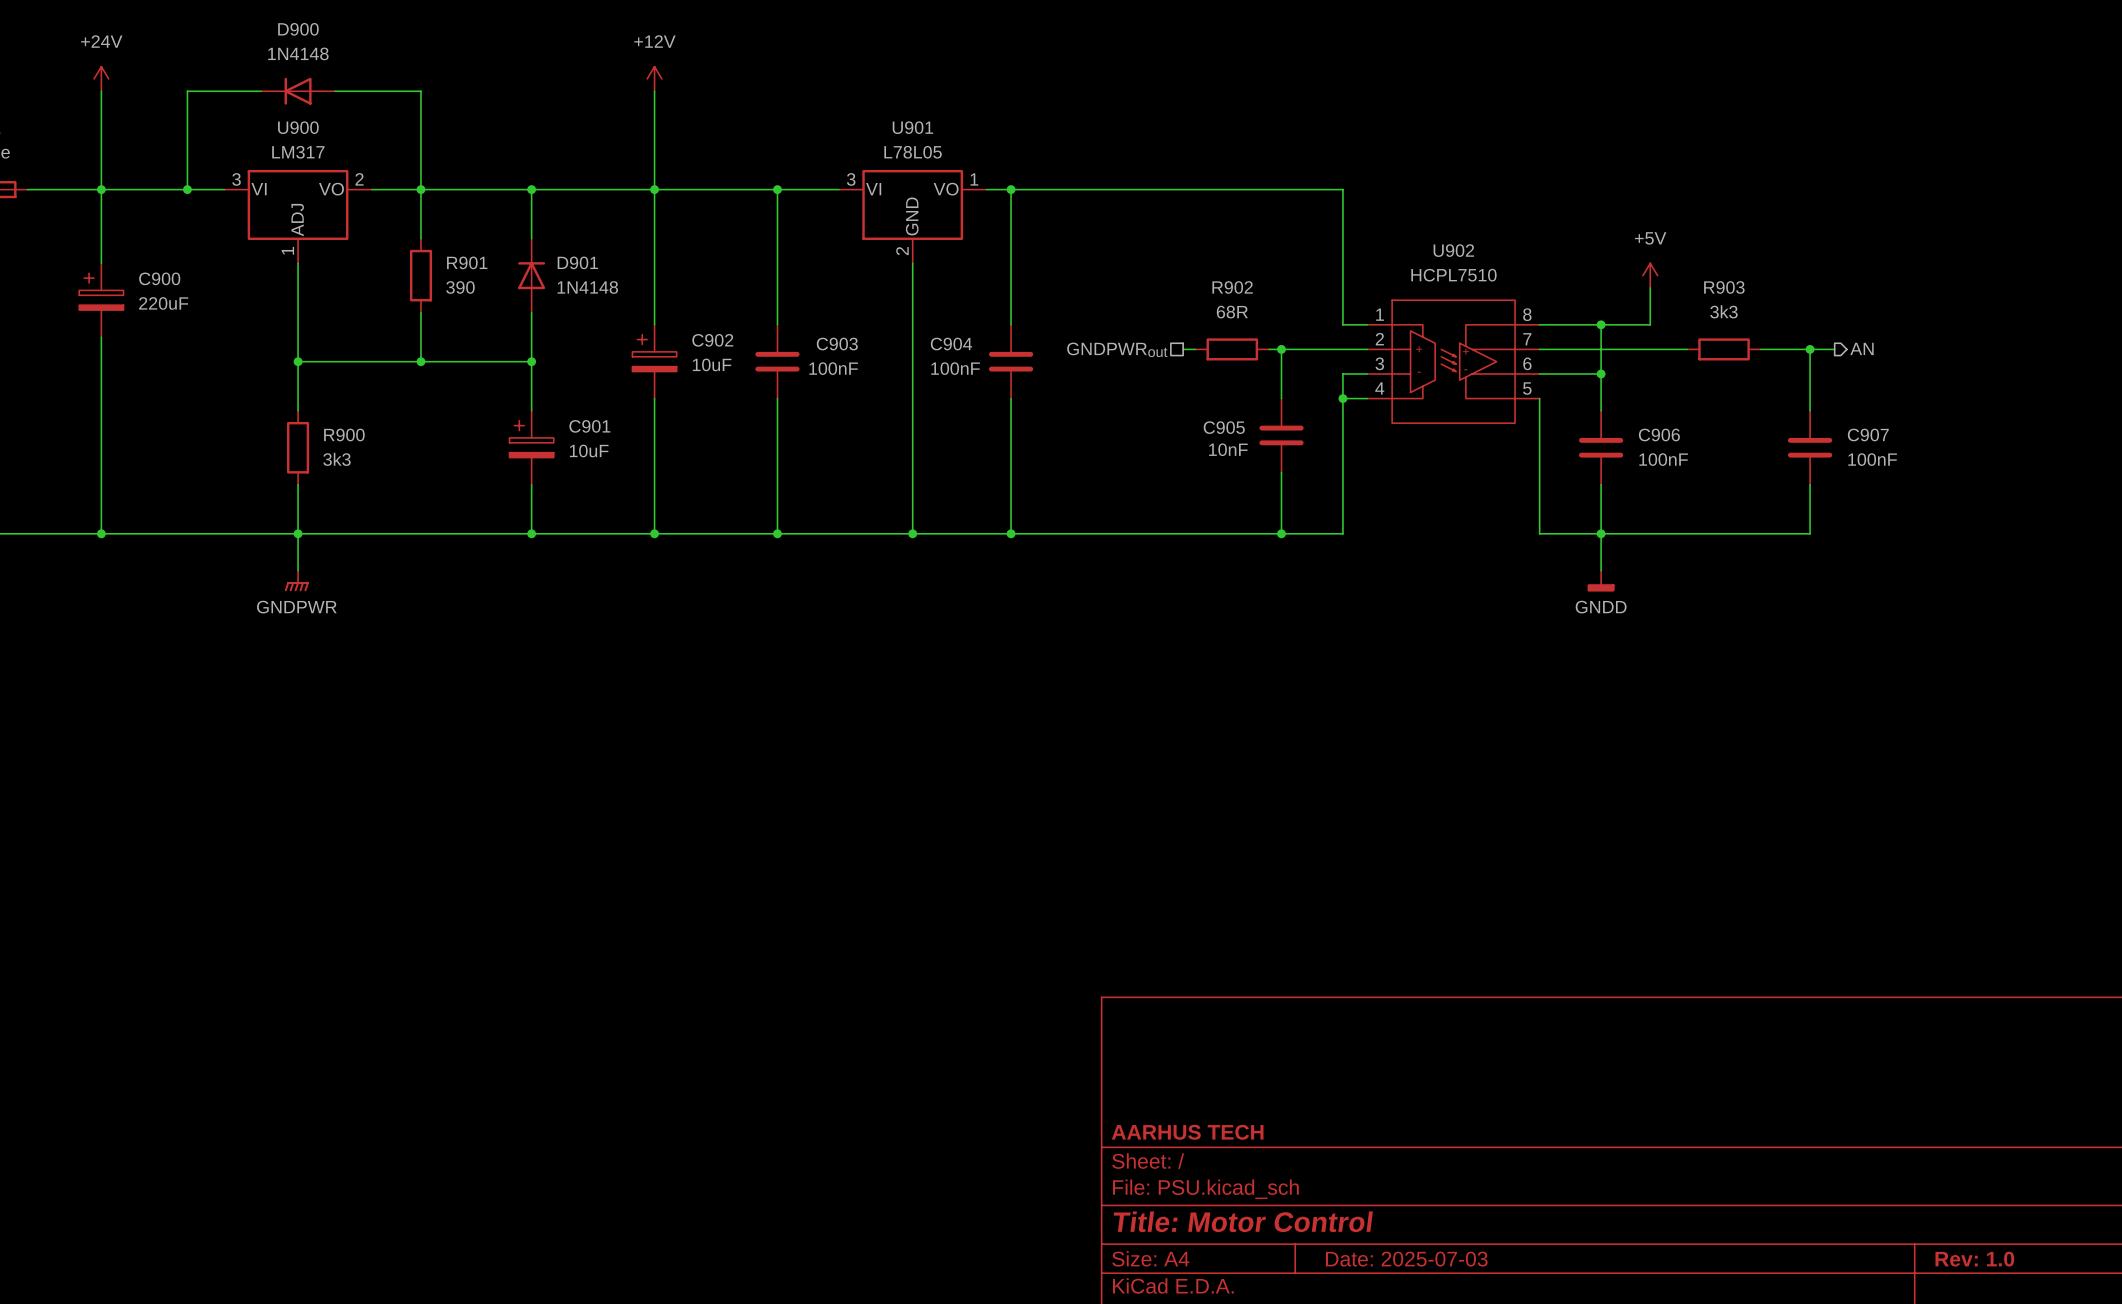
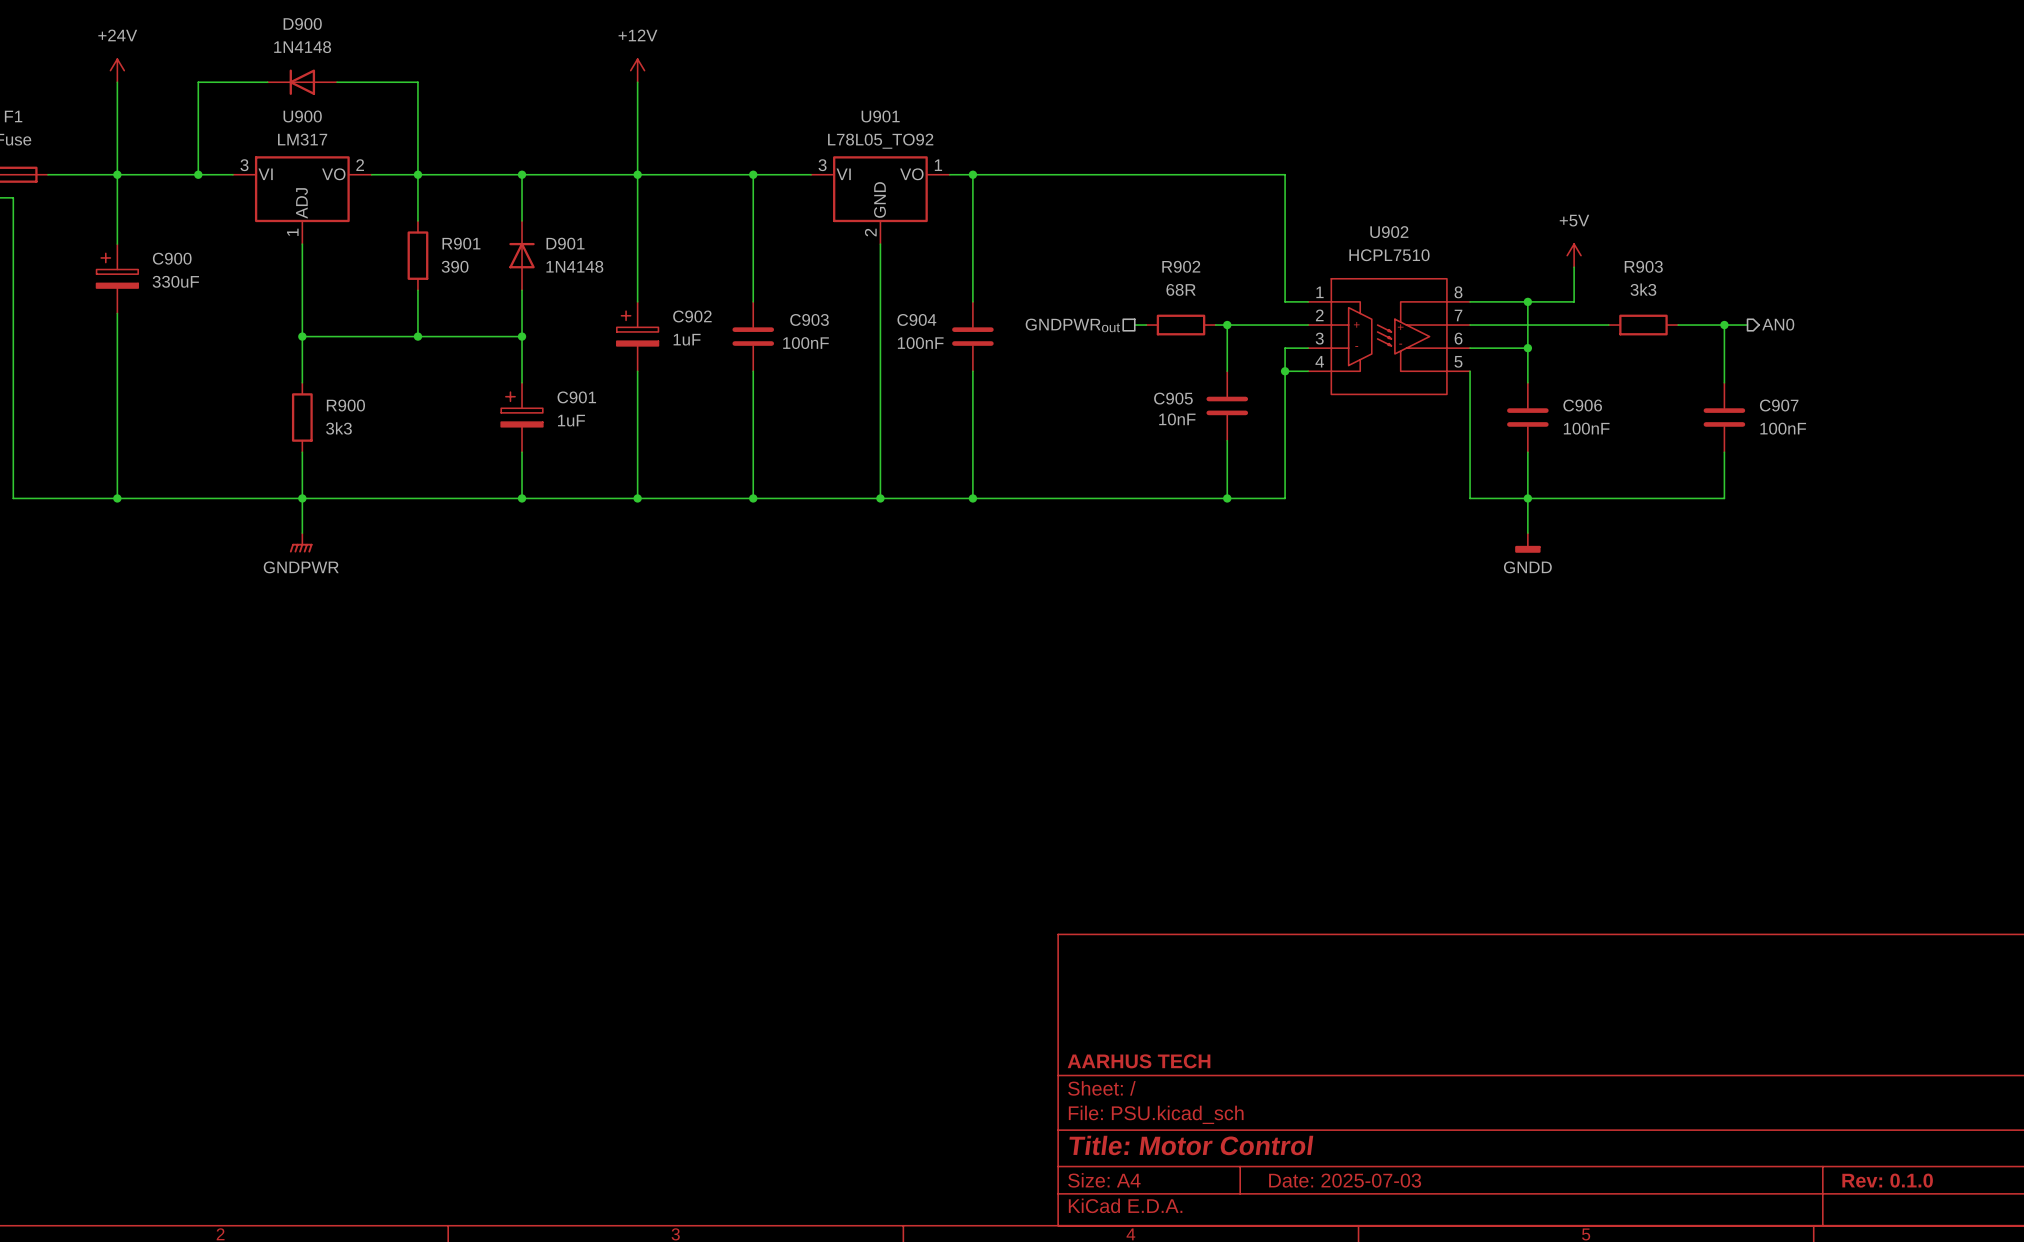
U901 value: L78L05 (913, 152) -> L78L05_TO92 (880, 141)
C900 value: 220uF (163, 303) -> 330uF (175, 281)
hierarchical label: AN (1861, 348) -> AN0 (1778, 324)
C902 value: 10uF (712, 364) -> 1uF (687, 339)
C901 value: 10uF (589, 450) -> 1uF (571, 420)
title block: Rev: 1.0 (1974, 1259) -> Rev: 0.1.0 (1887, 1180)

